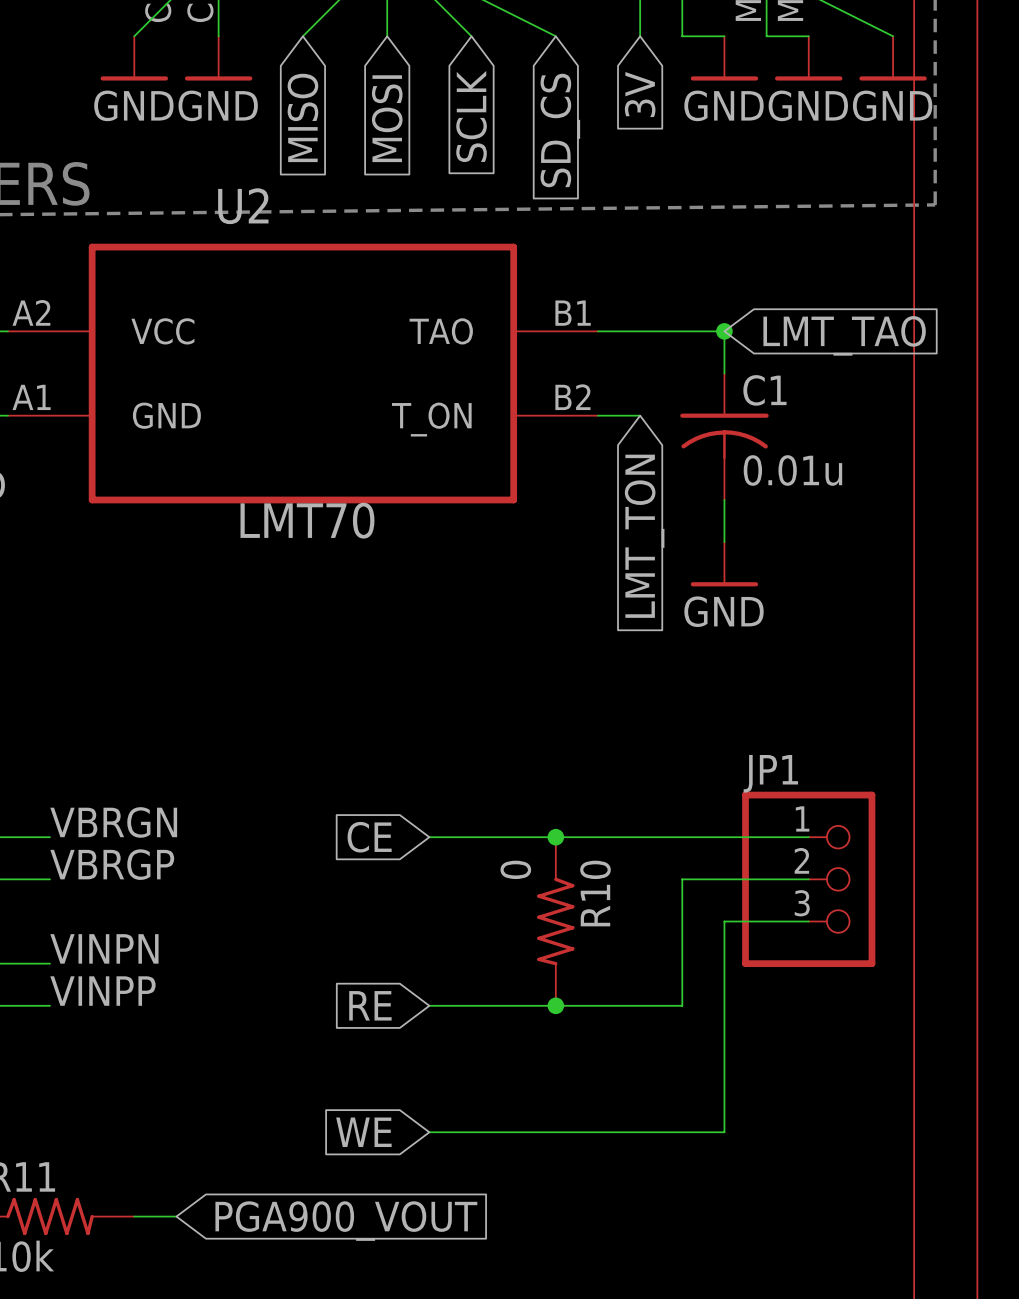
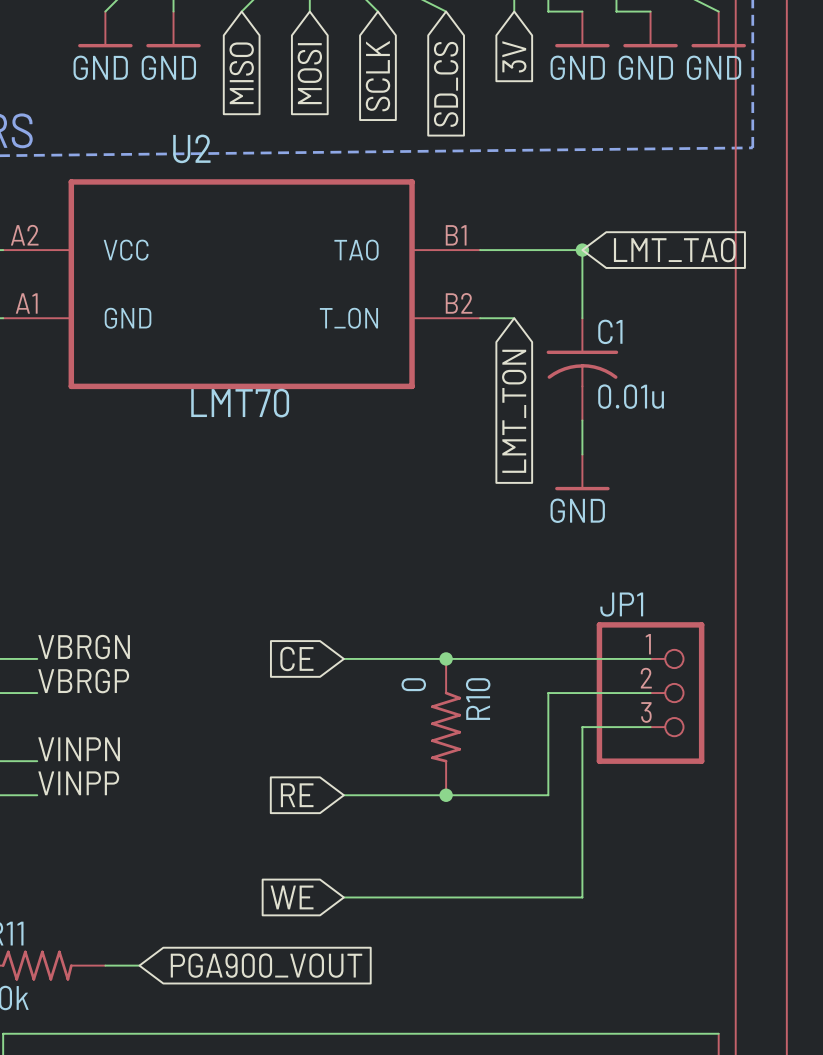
C1 position: (724, 436) -> (582, 369)
power symbol position: GND (724, 564) -> GND (582, 472)

